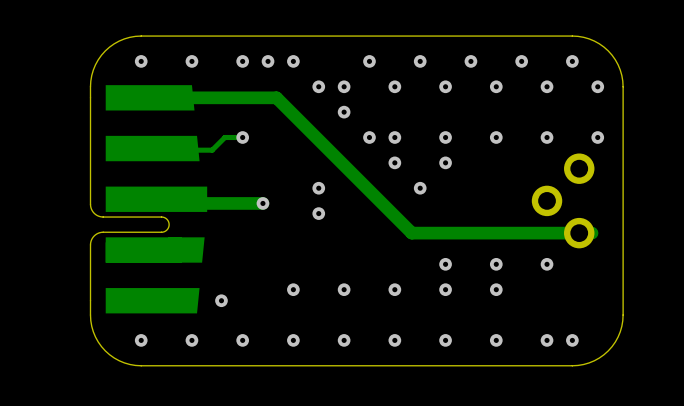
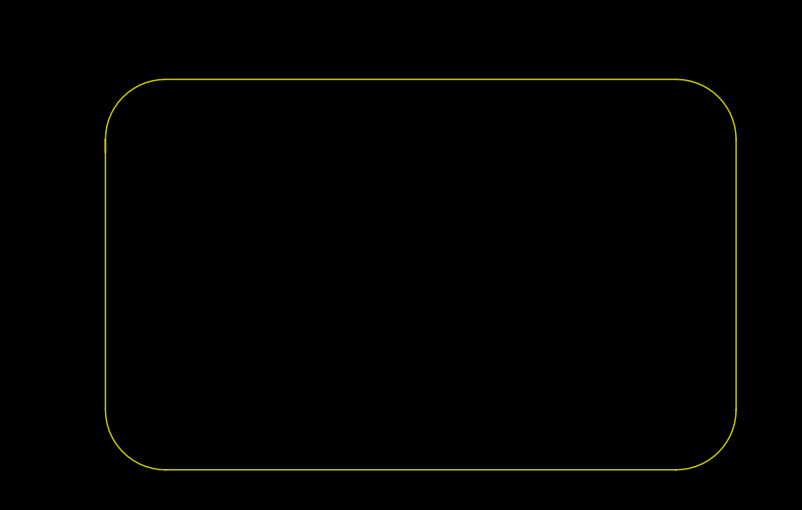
via: (141, 61) -> none
via: (191, 61) -> none
via: (242, 61) -> none
via: (268, 61) -> none
via: (293, 61) -> none
via: (369, 61) -> none
via: (420, 61) -> none
via: (470, 61) -> none
via: (521, 61) -> none
via: (572, 61) -> none
via: (318, 86) -> none
via: (344, 86) -> none
via: (394, 86) -> none
via: (445, 86) -> none
via: (496, 86) -> none
via: (547, 86) -> none
via: (597, 86) -> none
track: (148, 97) (276, 97) (411, 233) (592, 233) -> none
via: (344, 112) -> none
track: (242, 137) (224, 137) (212, 150) (153, 150) (151, 148) -> none
via: (242, 137) -> none
via: (369, 137) -> none
via: (394, 137) -> none
via: (445, 137) -> none
via: (496, 137) -> none
via: (547, 137) -> none
via: (597, 137) -> none
via: (394, 162) -> none
via: (445, 162) -> none
via: (318, 188) -> none
via: (420, 188) -> none
part: (148, 199) -> none
track: (156, 199) (156, 203) (262, 203) -> none
part: (563, 200) -> none
via: (262, 203) -> none
via: (318, 213) -> none
via: (445, 264) -> none
via: (496, 264) -> none
via: (547, 264) -> none
via: (293, 289) -> none
via: (344, 289) -> none
via: (394, 289) -> none
via: (445, 289) -> none
via: (496, 289) -> none
board edge: (90, 300) (90, 315) -> (105, 139) (105, 409)
via: (221, 300) -> none
via: (141, 340) -> none
via: (191, 340) -> none
via: (242, 340) -> none
via: (293, 340) -> none
via: (344, 340) -> none
via: (394, 340) -> none
via: (445, 340) -> none
via: (496, 340) -> none
via: (547, 340) -> none
via: (572, 340) -> none

